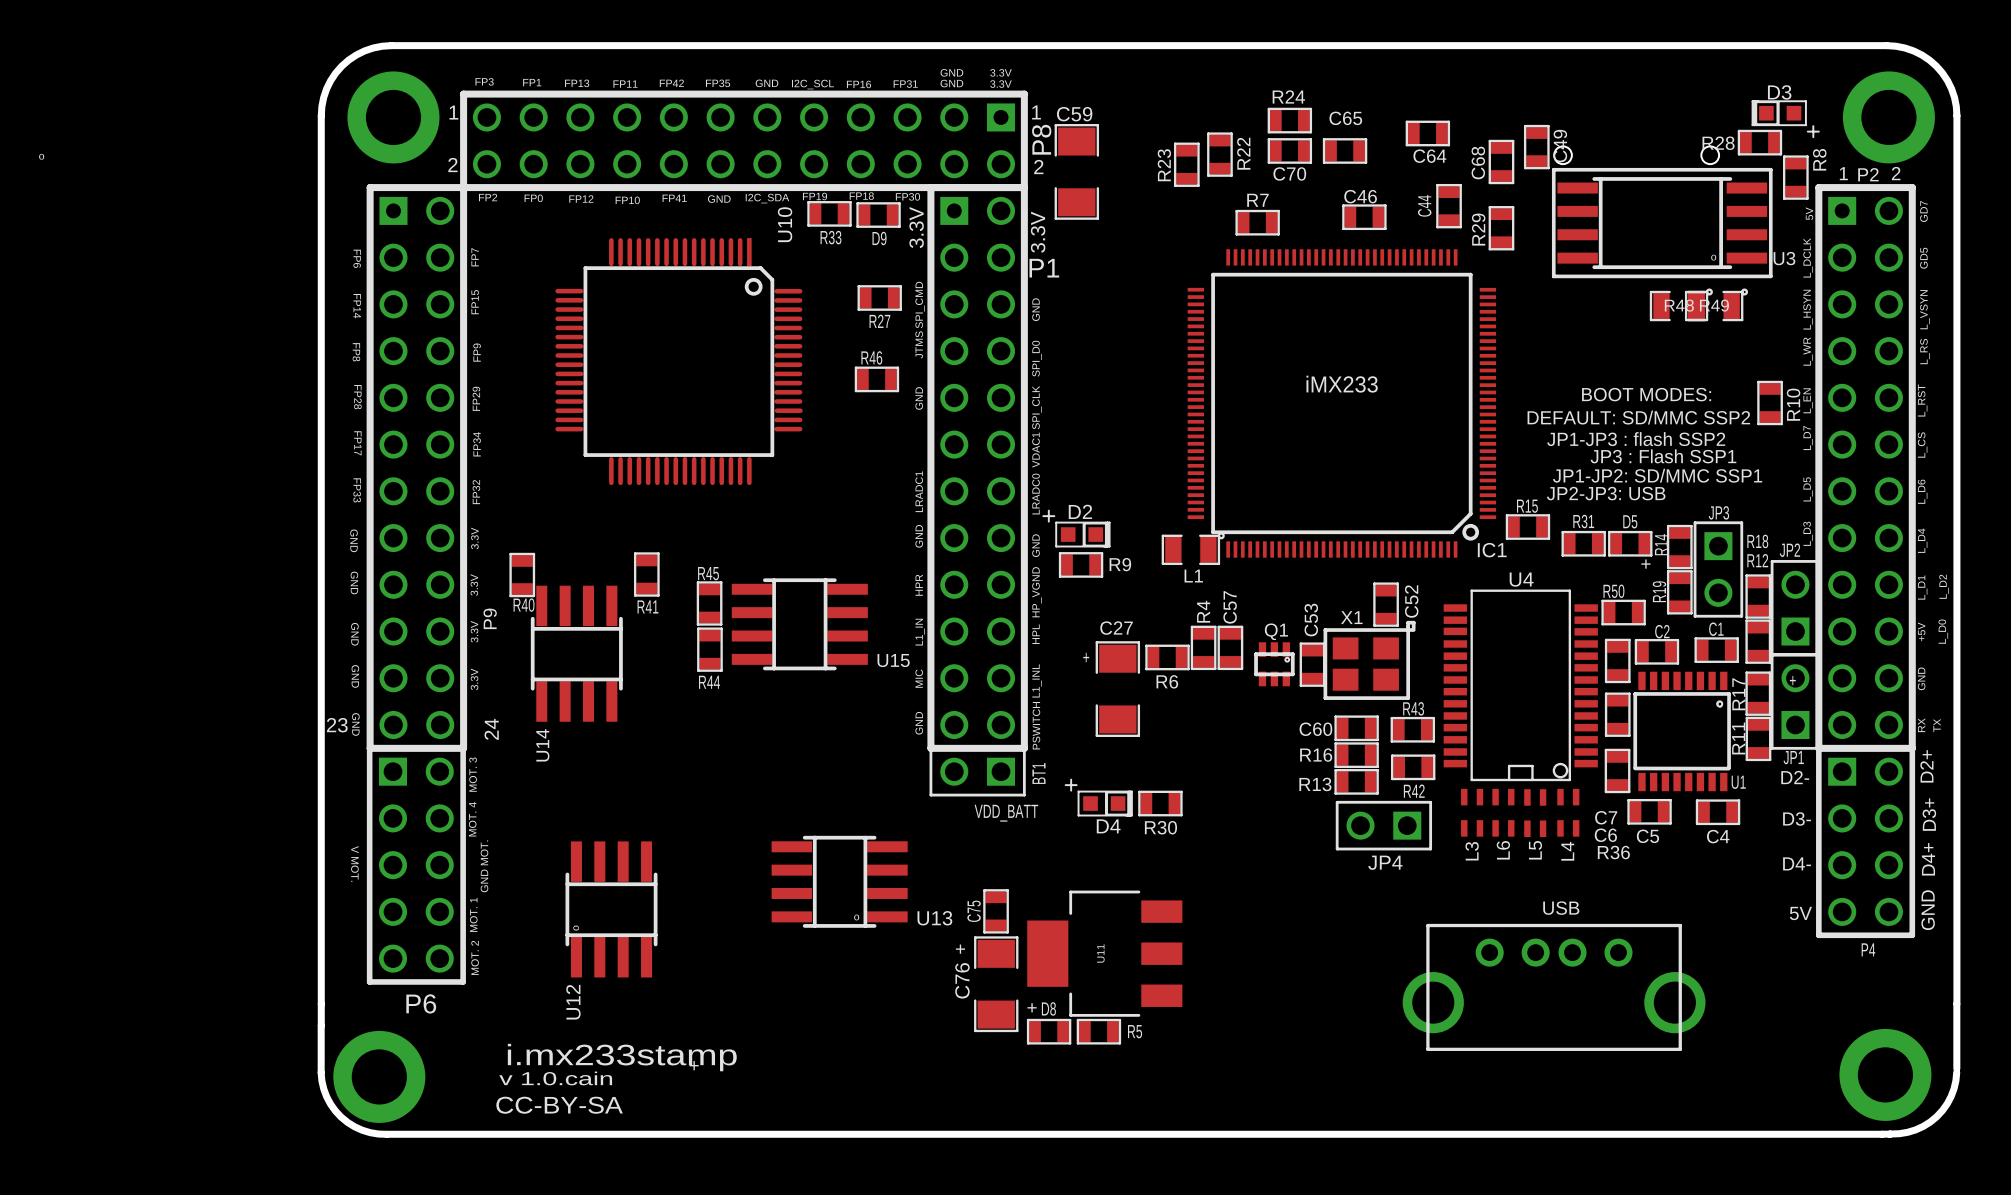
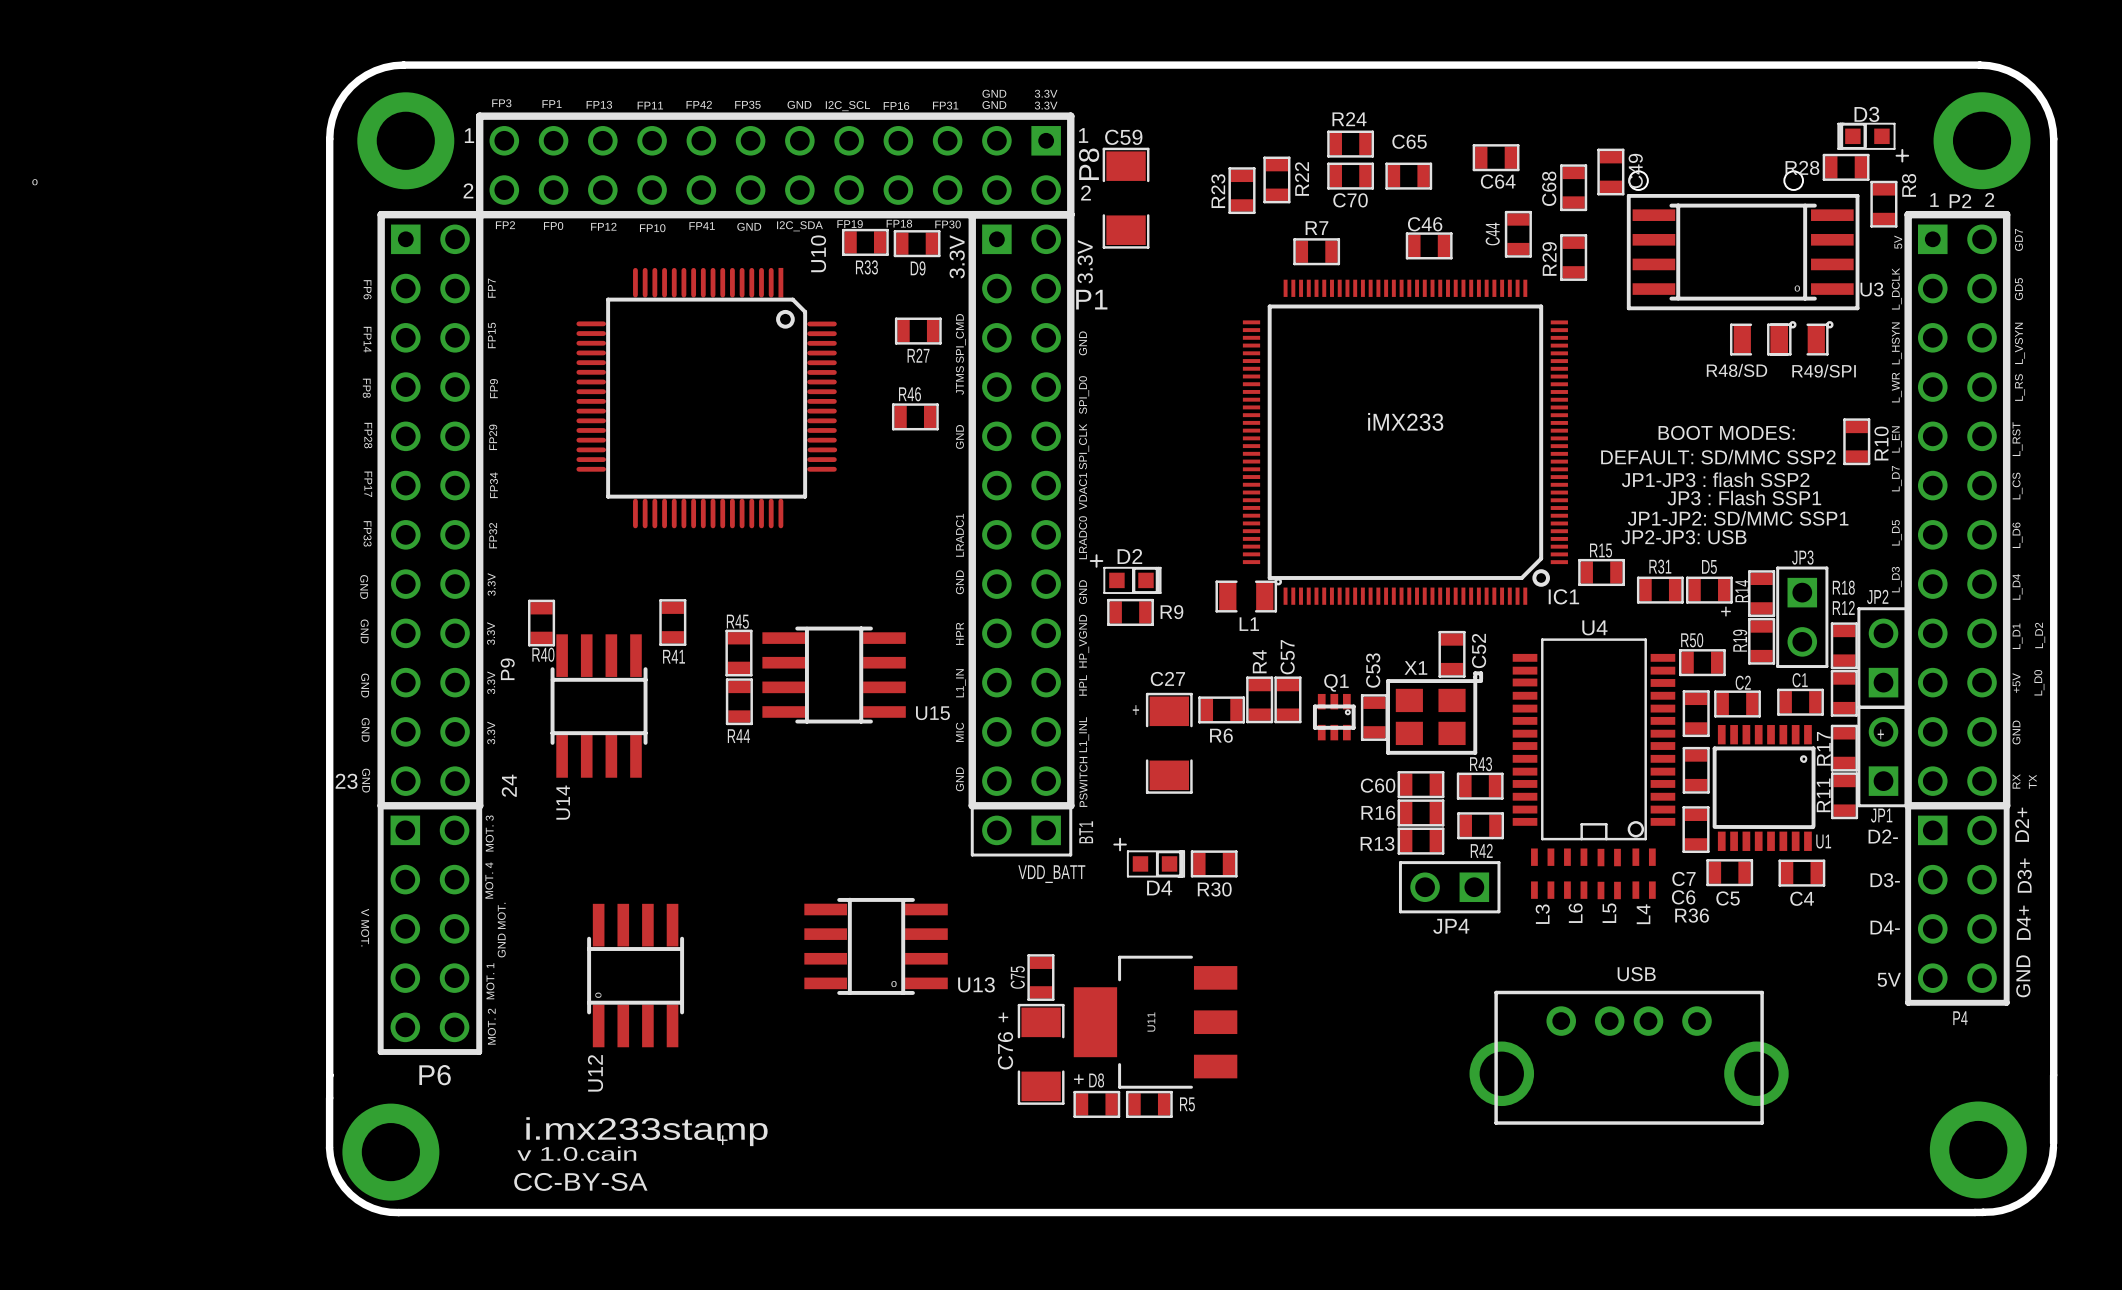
R48 name: R48 (1679, 305) -> R48/SD (1736, 370)
R49 name: R49 (1714, 305) -> R49/SPI (1824, 371)

